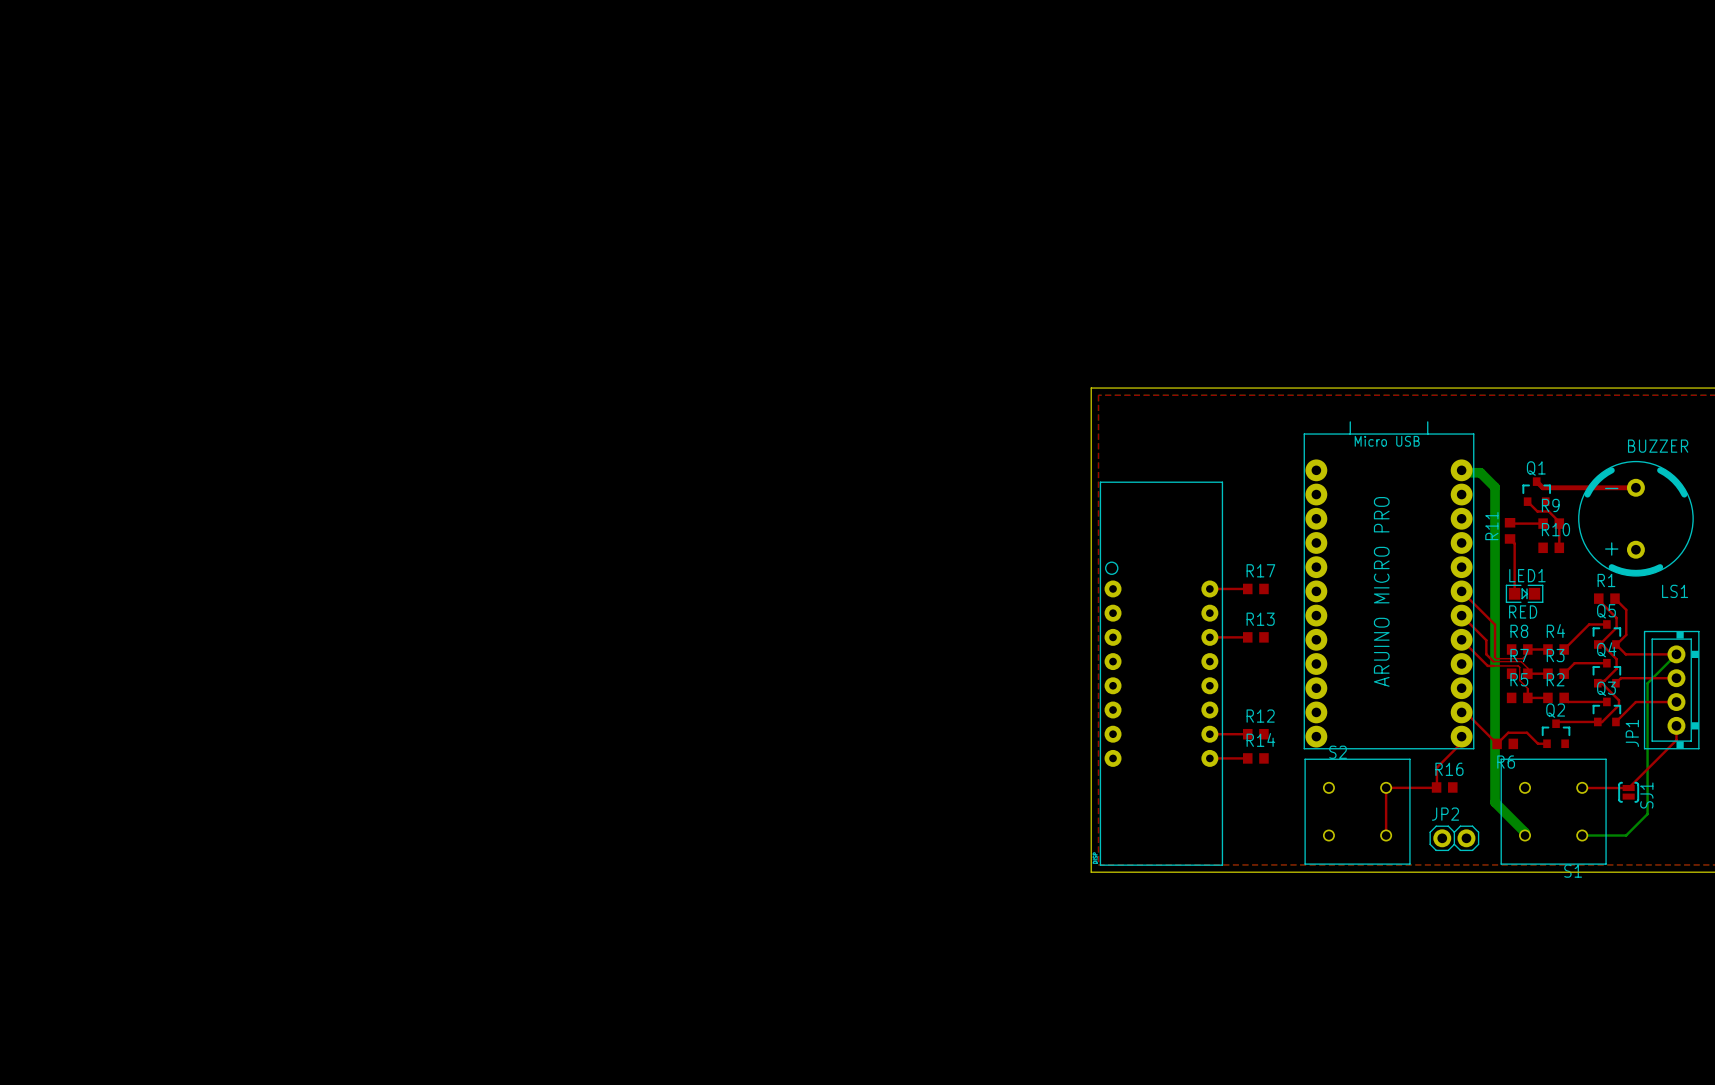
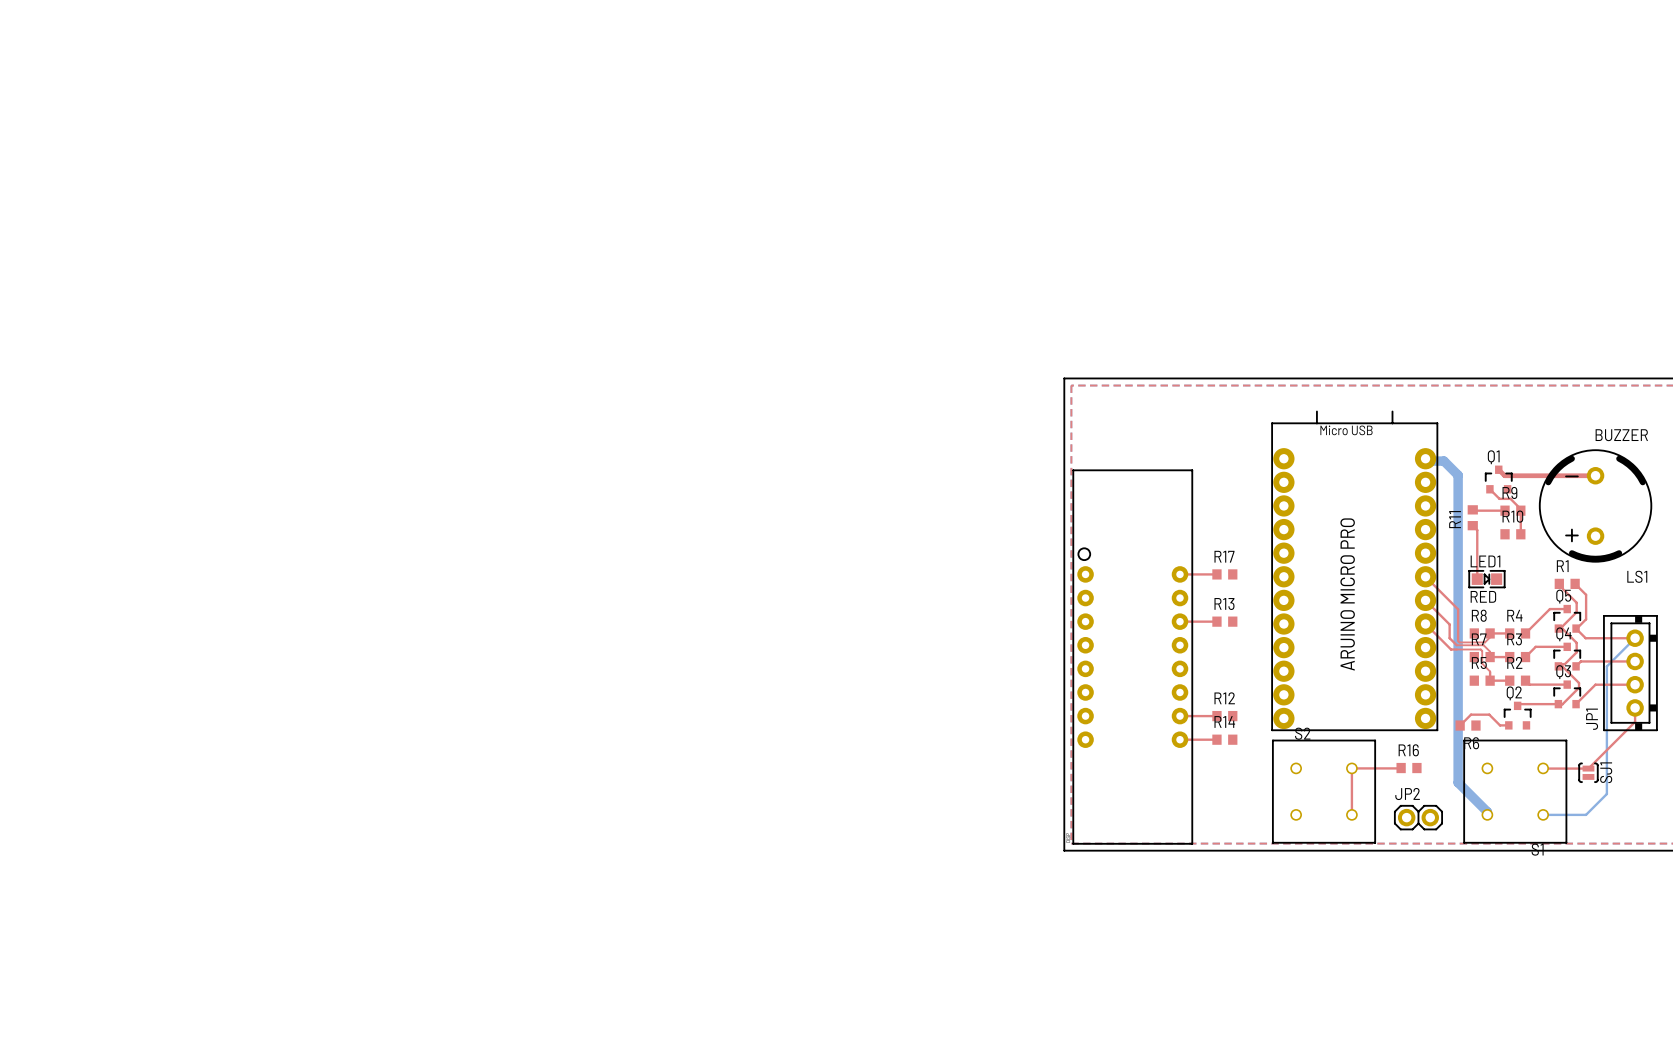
top track: (1461, 712) (1465, 712) (1497, 743) -> none
top track: (1461, 736) (1461, 742) (1436, 767) (1436, 787) -> none

